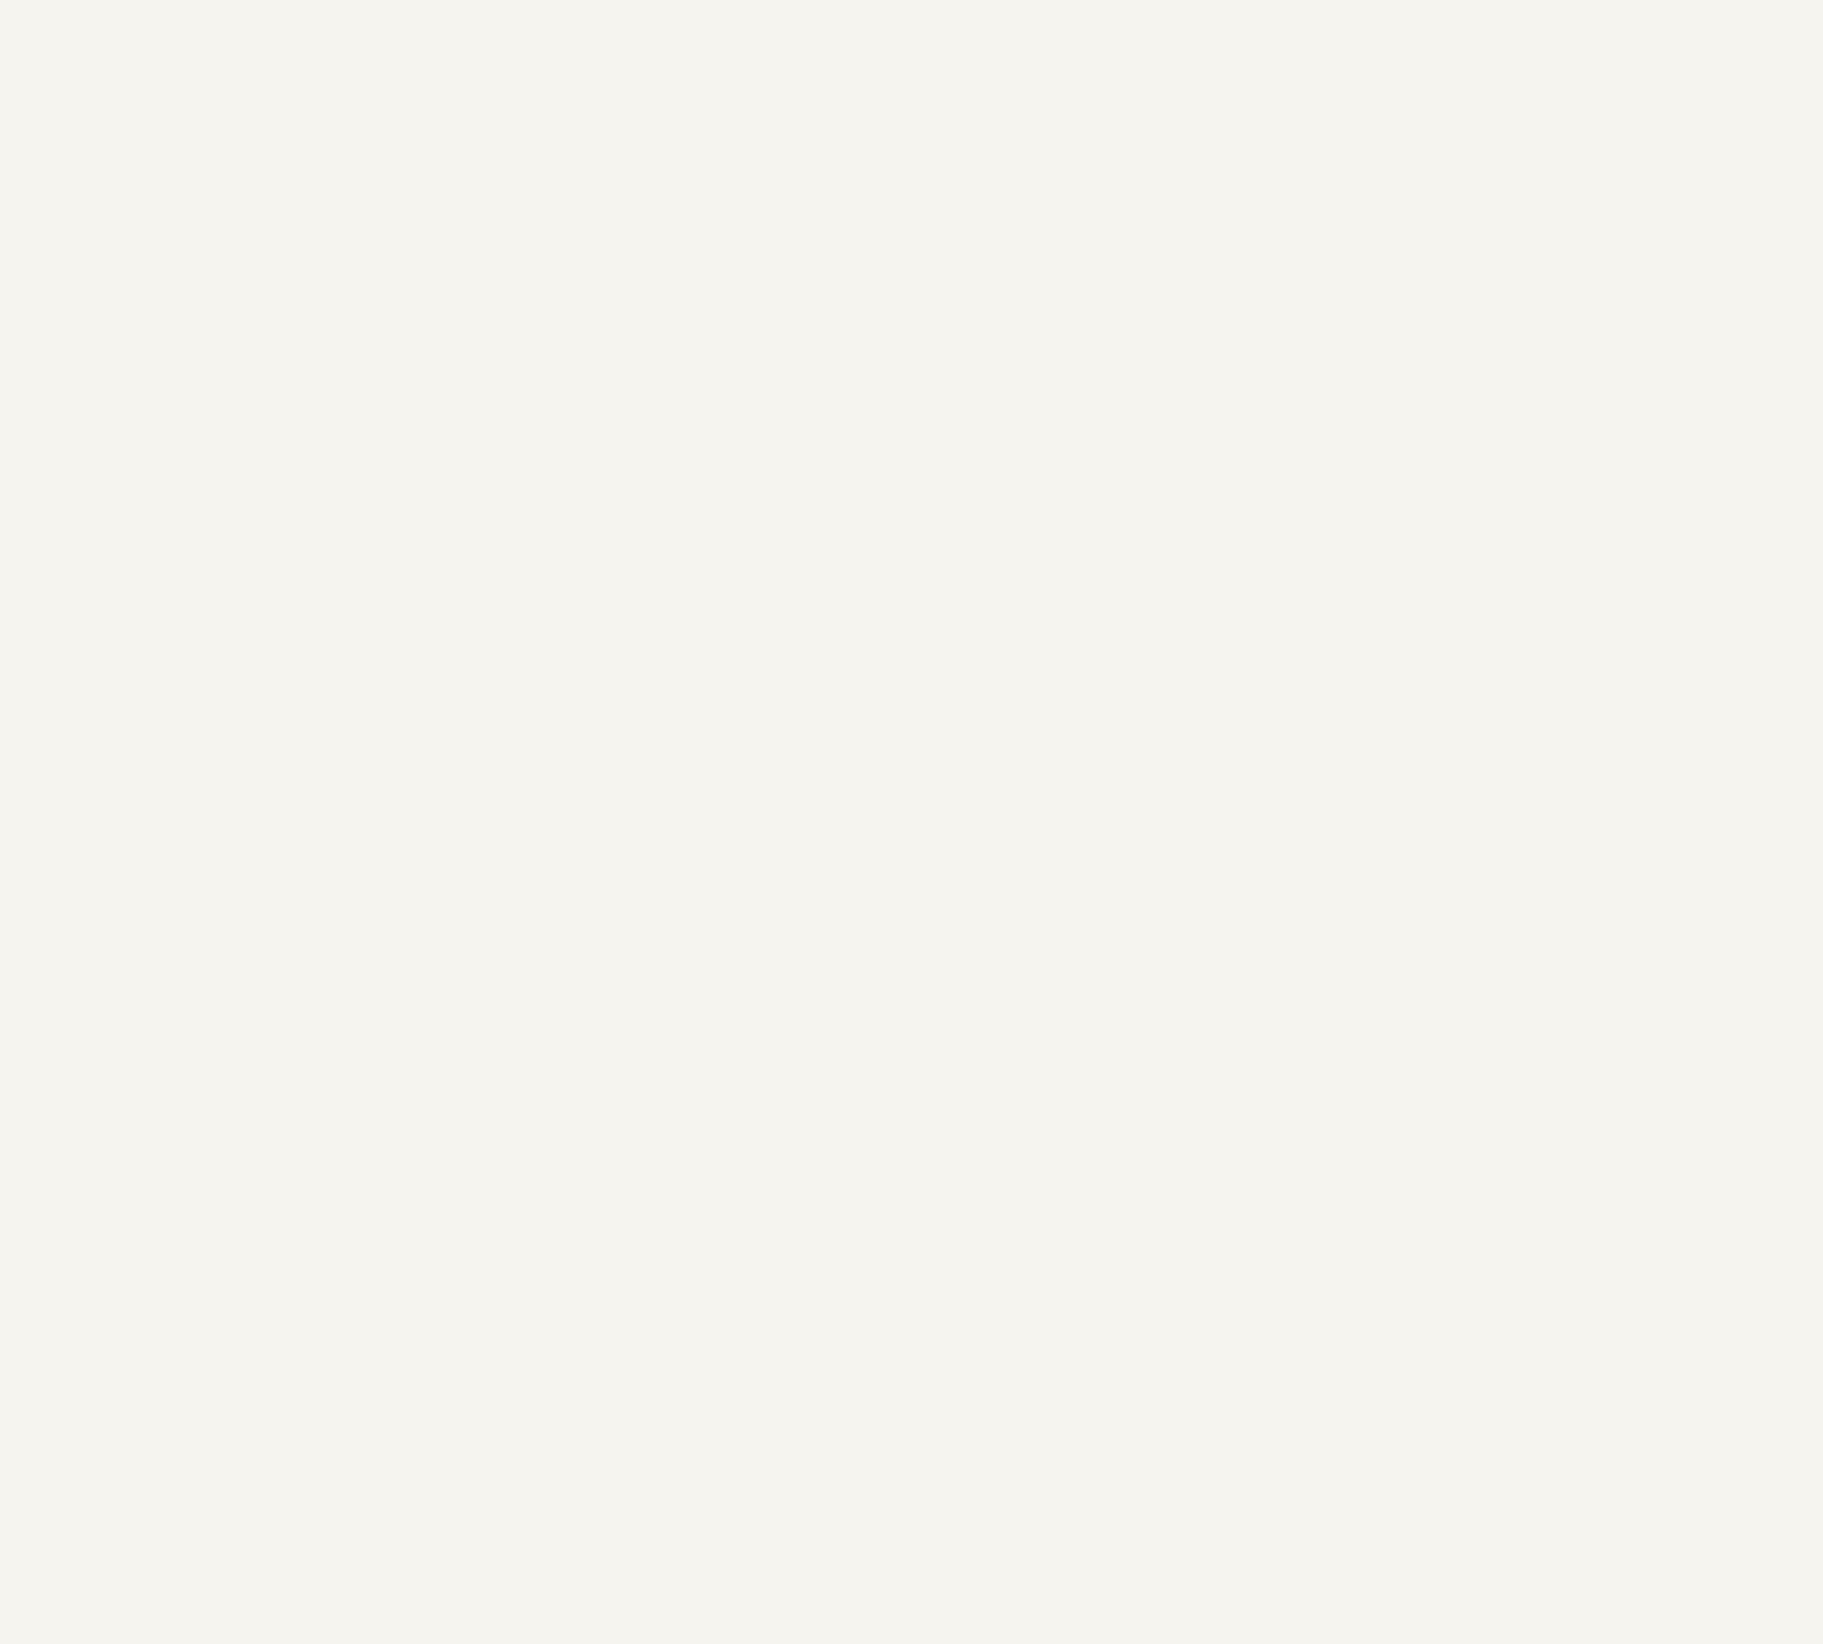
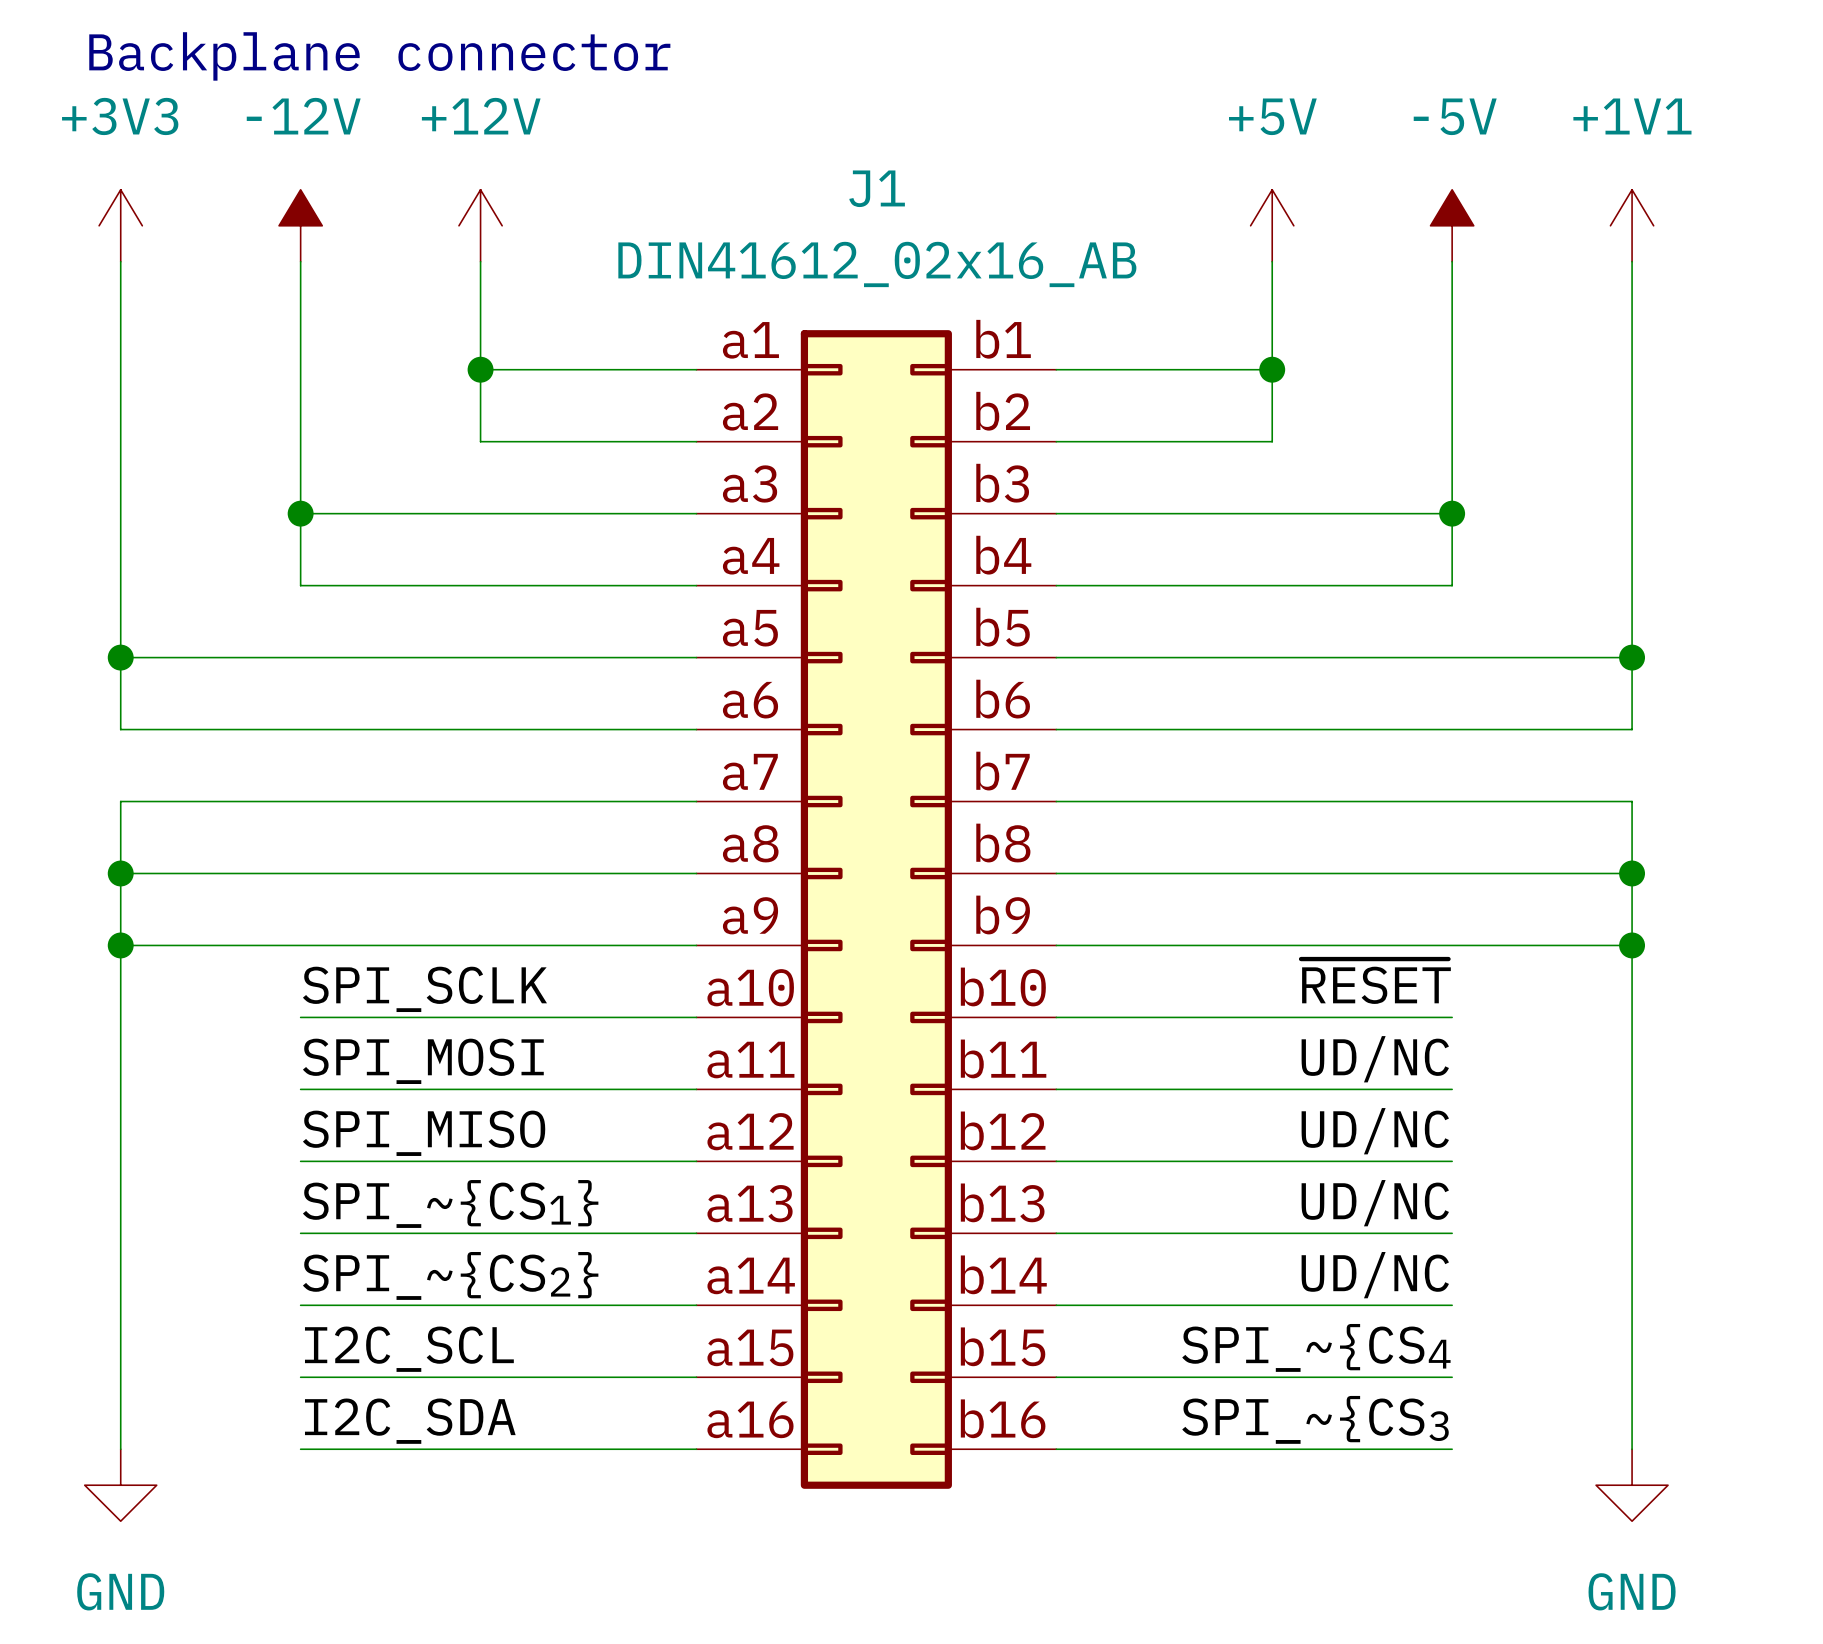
text: none -> Backplane connector (379, 56)
power symbol: none -> +3V3 (120, 225)
power symbol: none -> -12V (300, 225)
power symbol: none -> +12V (480, 225)
power symbol: none -> +5V (1272, 225)
power symbol: none -> -5V (1452, 225)
power symbol: none -> +1V1 (1632, 225)
wire: none -> (120, 261) (120, 729) (696, 729)
wire: none -> (300, 261) (300, 585) (696, 585)
wire: none -> (480, 261) (480, 441) (696, 441)
wire: none -> (1272, 261) (1272, 441) (1056, 441)
wire: none -> (1452, 261) (1452, 585) (1056, 585)
wire: none -> (1632, 261) (1632, 729) (1056, 729)
wire: none -> (480, 369) (696, 369)
junction: none -> (480, 369)
wire: none -> (1056, 369) (1272, 369)
junction: none -> (1272, 369)
wire: none -> (300, 513) (696, 513)
junction: none -> (300, 513)
wire: none -> (1056, 513) (1452, 513)
junction: none -> (1452, 513)
wire: none -> (120, 657) (696, 657)
junction: none -> (120, 657)
wire: none -> (1056, 657) (1632, 657)
junction: none -> (1632, 657)
wire: none -> (696, 801) (120, 801) (120, 1449)
wire: none -> (1056, 801) (1632, 801) (1632, 1449)
wire: none -> (120, 873) (696, 873)
junction: none -> (120, 873)
wire: none -> (1056, 873) (1632, 873)
junction: none -> (1632, 873)
J1: none -> DIN41612_02x16_AB (876, 909)
wire: none -> (120, 945) (696, 945)
junction: none -> (120, 945)
wire: none -> (1056, 945) (1632, 945)
junction: none -> (1632, 945)
label: none -> ~{RESET} (1375, 981)
label: none -> SPI_SCLK (424, 989)
wire: none -> (300, 1017) (696, 1017)
wire: none -> (1056, 1017) (1452, 1017)
label: none -> UD/NC (1375, 1059)
label: none -> SPI_MOSI (423, 1061)
wire: none -> (300, 1089) (696, 1089)
wire: none -> (1056, 1089) (1452, 1089)
label: none -> UD/NC (1375, 1131)
label: none -> SPI_MISO (424, 1133)
wire: none -> (300, 1161) (696, 1161)
wire: none -> (1056, 1161) (1452, 1161)
label: none -> UD/NC (1375, 1203)
label: none -> SPI_~{CS1} (450, 1203)
wire: none -> (300, 1233) (696, 1233)
wire: none -> (1056, 1233) (1452, 1233)
label: none -> UD/NC (1375, 1275)
label: none -> SPI_~{CS2} (450, 1275)
wire: none -> (300, 1305) (696, 1305)
wire: none -> (1056, 1305) (1452, 1305)
label: none -> I2C_SCL (409, 1349)
label: none -> SPI_~{CS4 (1316, 1347)
wire: none -> (300, 1377) (696, 1377)
wire: none -> (1056, 1377) (1452, 1377)
label: none -> I2C_SDA (410, 1421)
label: none -> SPI_~{CS3 (1315, 1419)
wire: none -> (300, 1449) (696, 1449)
wire: none -> (1056, 1449) (1452, 1449)
power symbol: none -> GND (120, 1485)
power symbol: none -> GND (1632, 1485)

